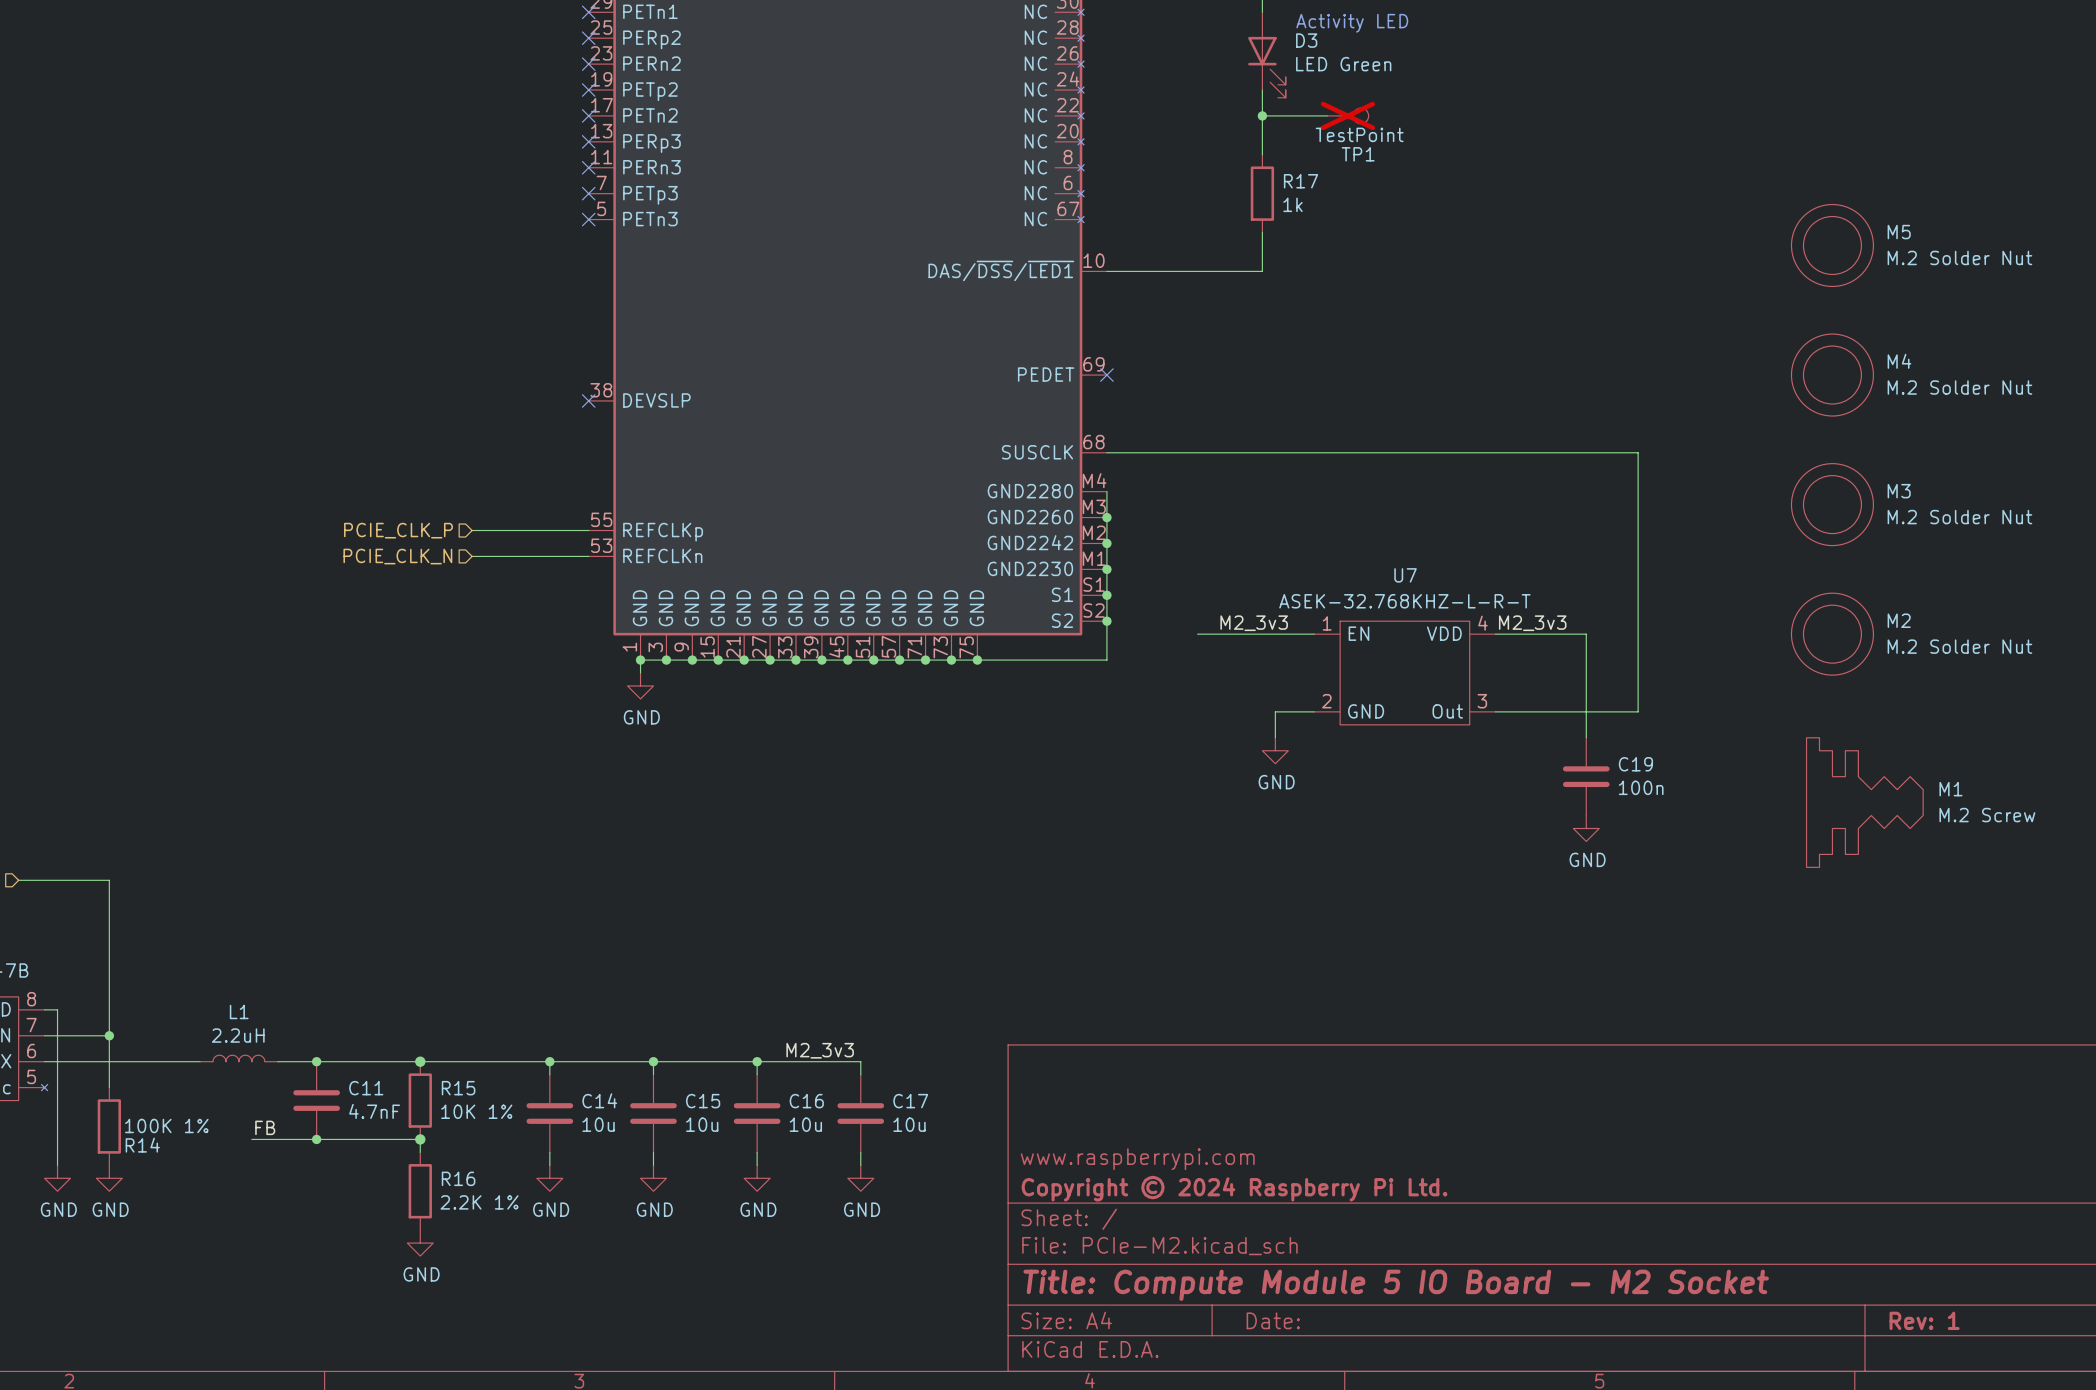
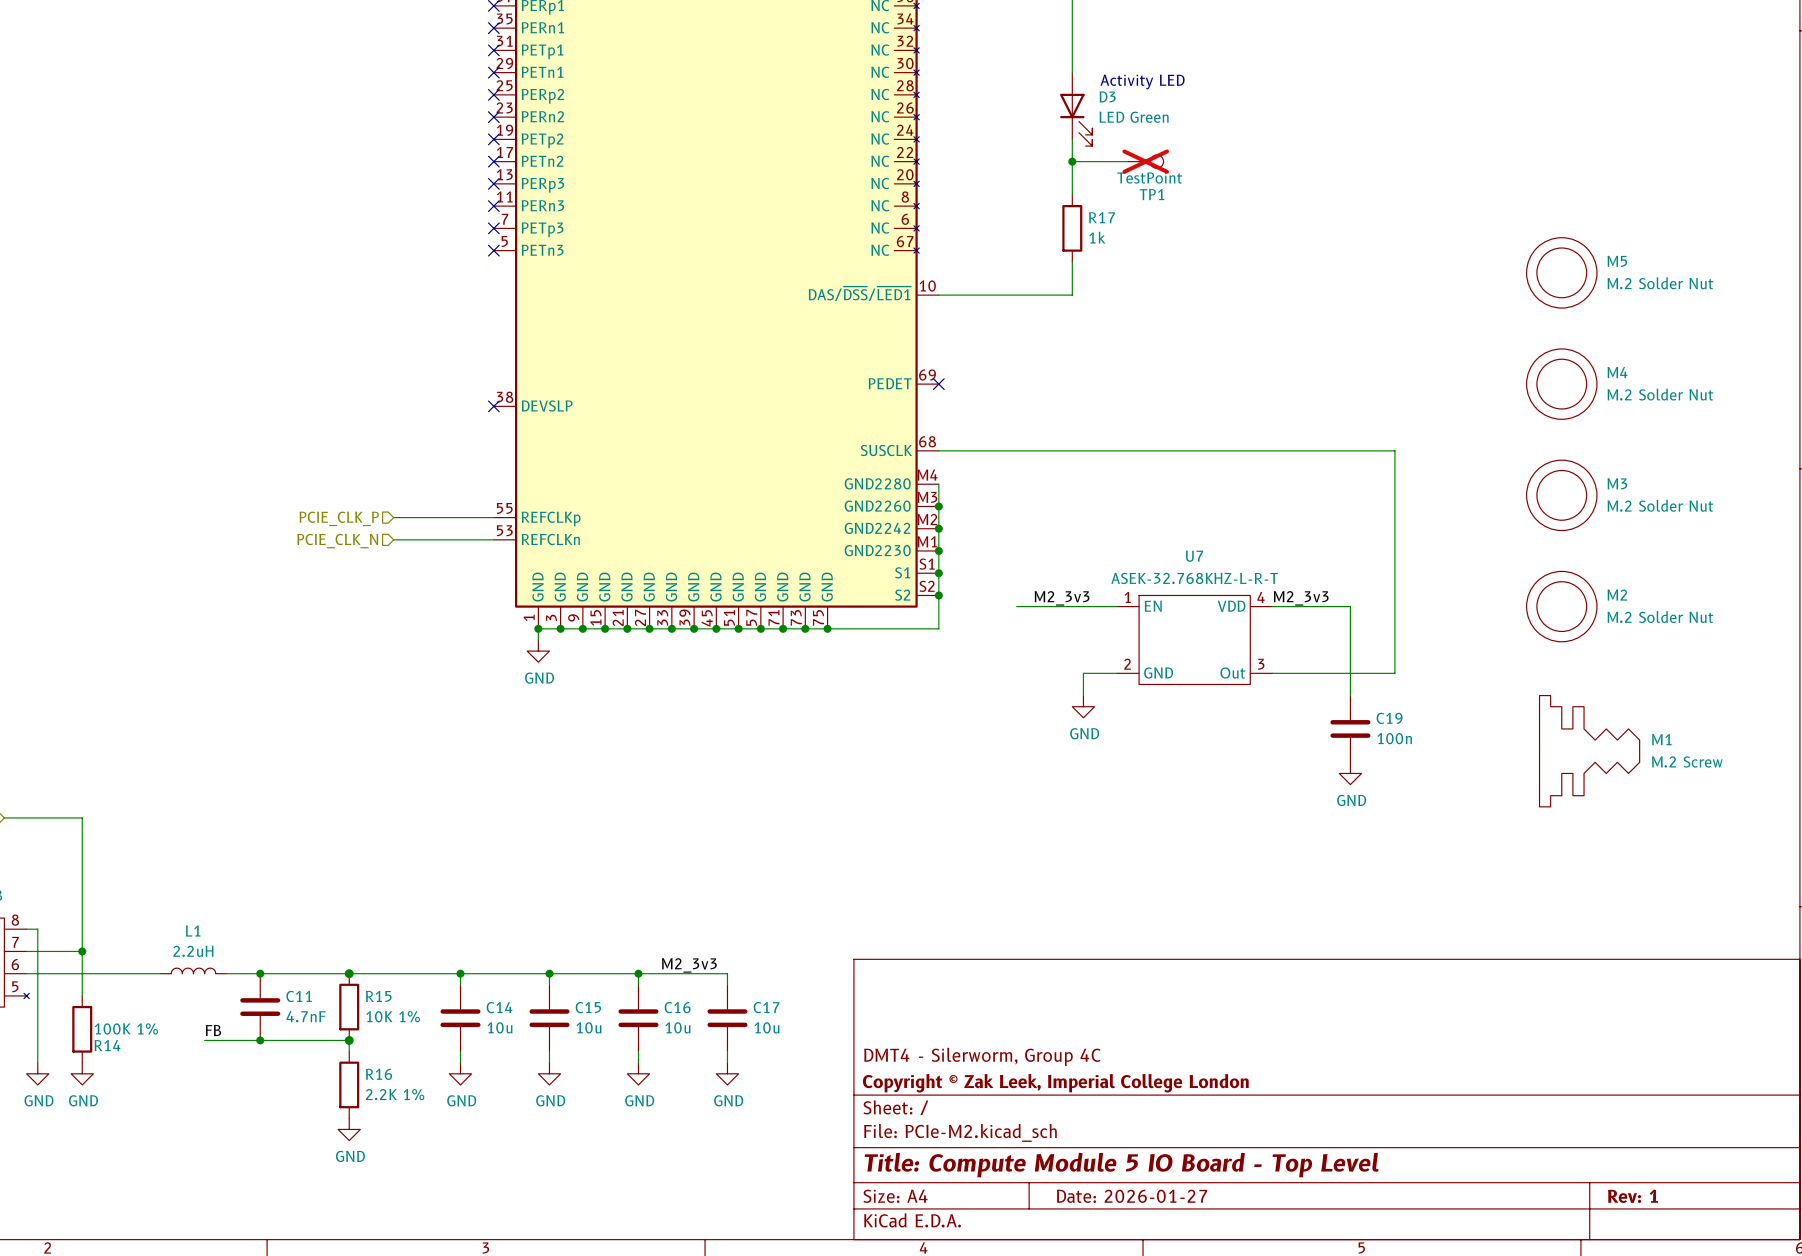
title block: www.raspberrypi.com (1137, 1159) -> DMT4 - Silerworm, Group 4C (982, 1056)
title block: Copyright © 2024 Raspberry Pi Ltd. (1234, 1188) -> Copyright © Zak Leek, Imperial College London (1055, 1083)
title block: Title: Compute Module 5 IO Board - M2 Socket (1396, 1285) -> Title: Compute Module 5 IO Board - Top Level (1121, 1165)
title block: Date: (1273, 1320) -> Date: 2026-01-27 (1131, 1196)

